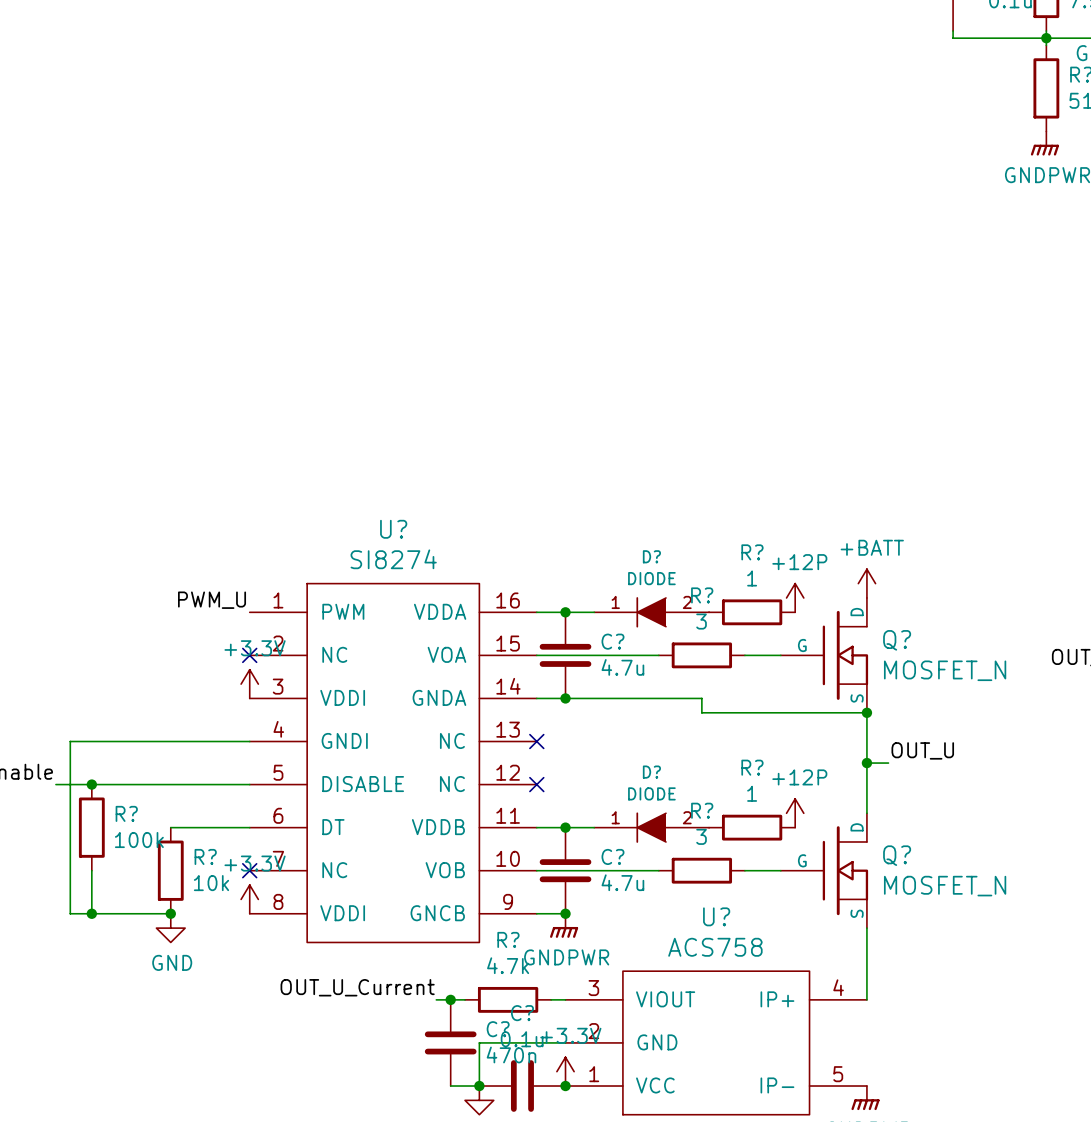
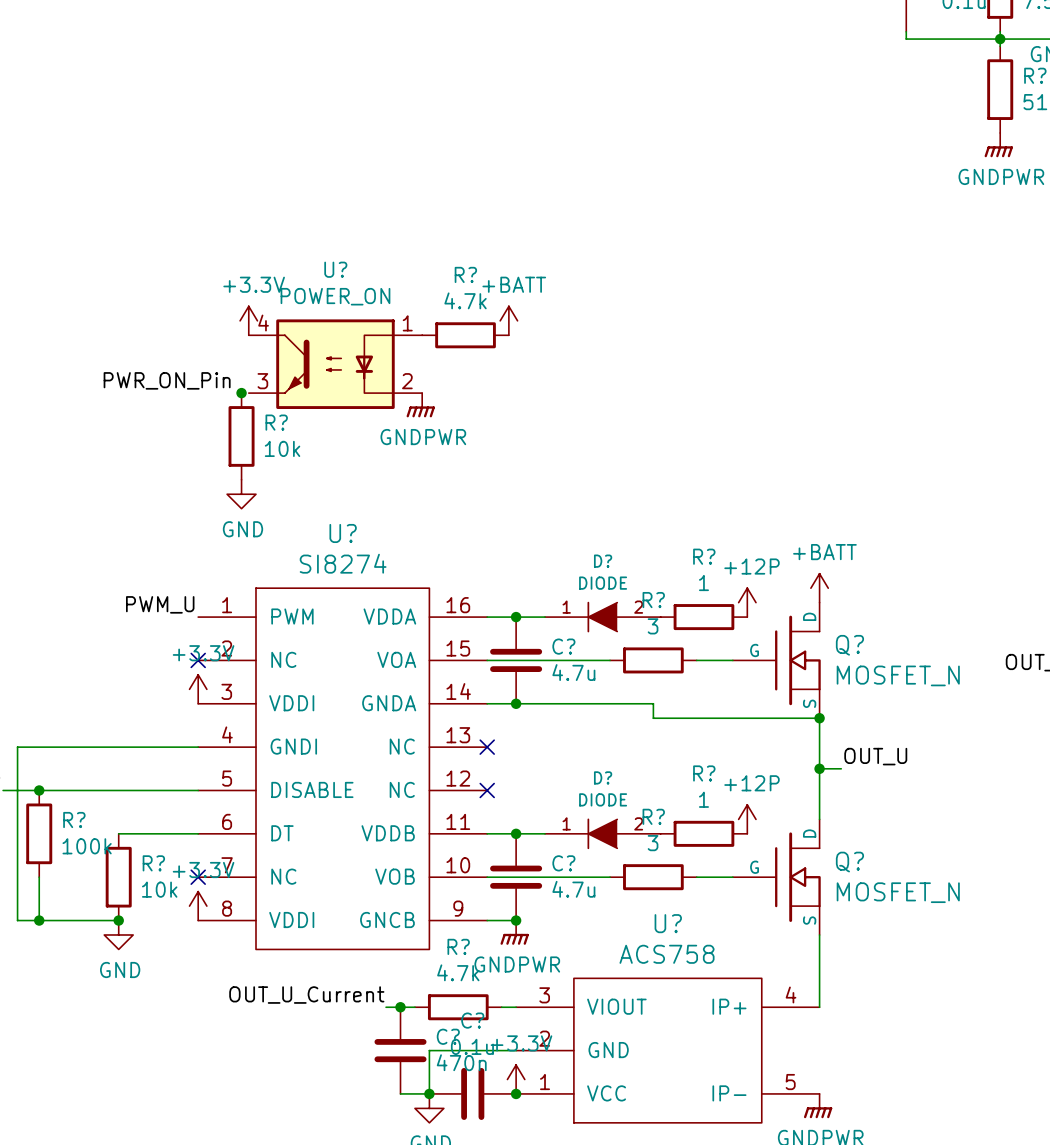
power symbol: none -> +3.3V (248, 320)
power symbol: none -> +BATT (508, 320)
R?: none -> 4.7k (465, 335)
U?: none -> POWER_ON (335, 364)
label: none -> PWR_ON_Pin (167, 380)
junction: none -> (241, 393)
power symbol: none -> GNDPWR (420, 405)
R?: none -> 10k (241, 436)
power symbol: none -> GND (241, 494)

